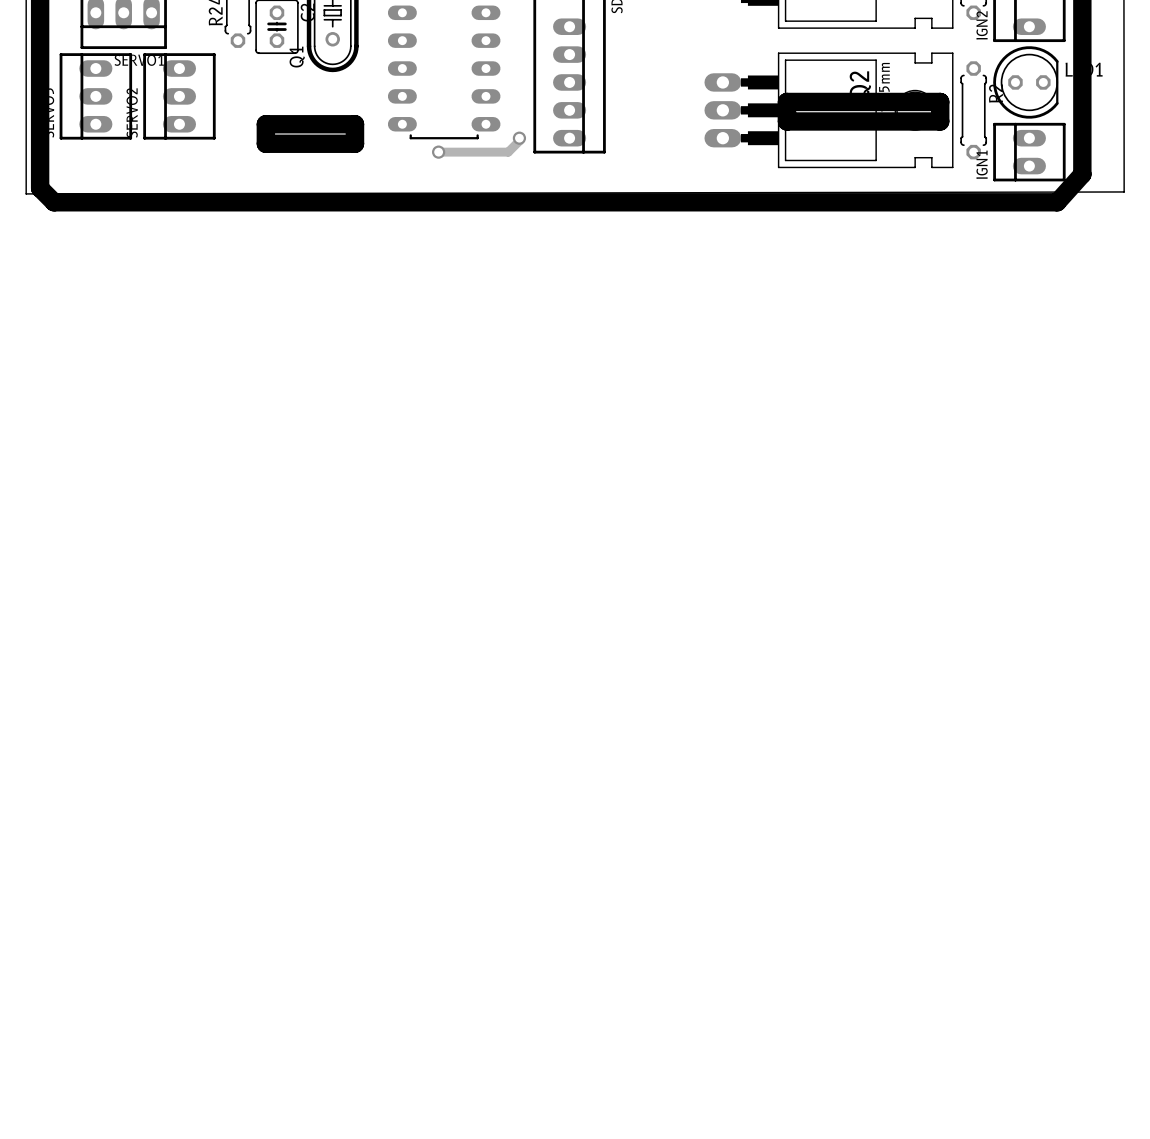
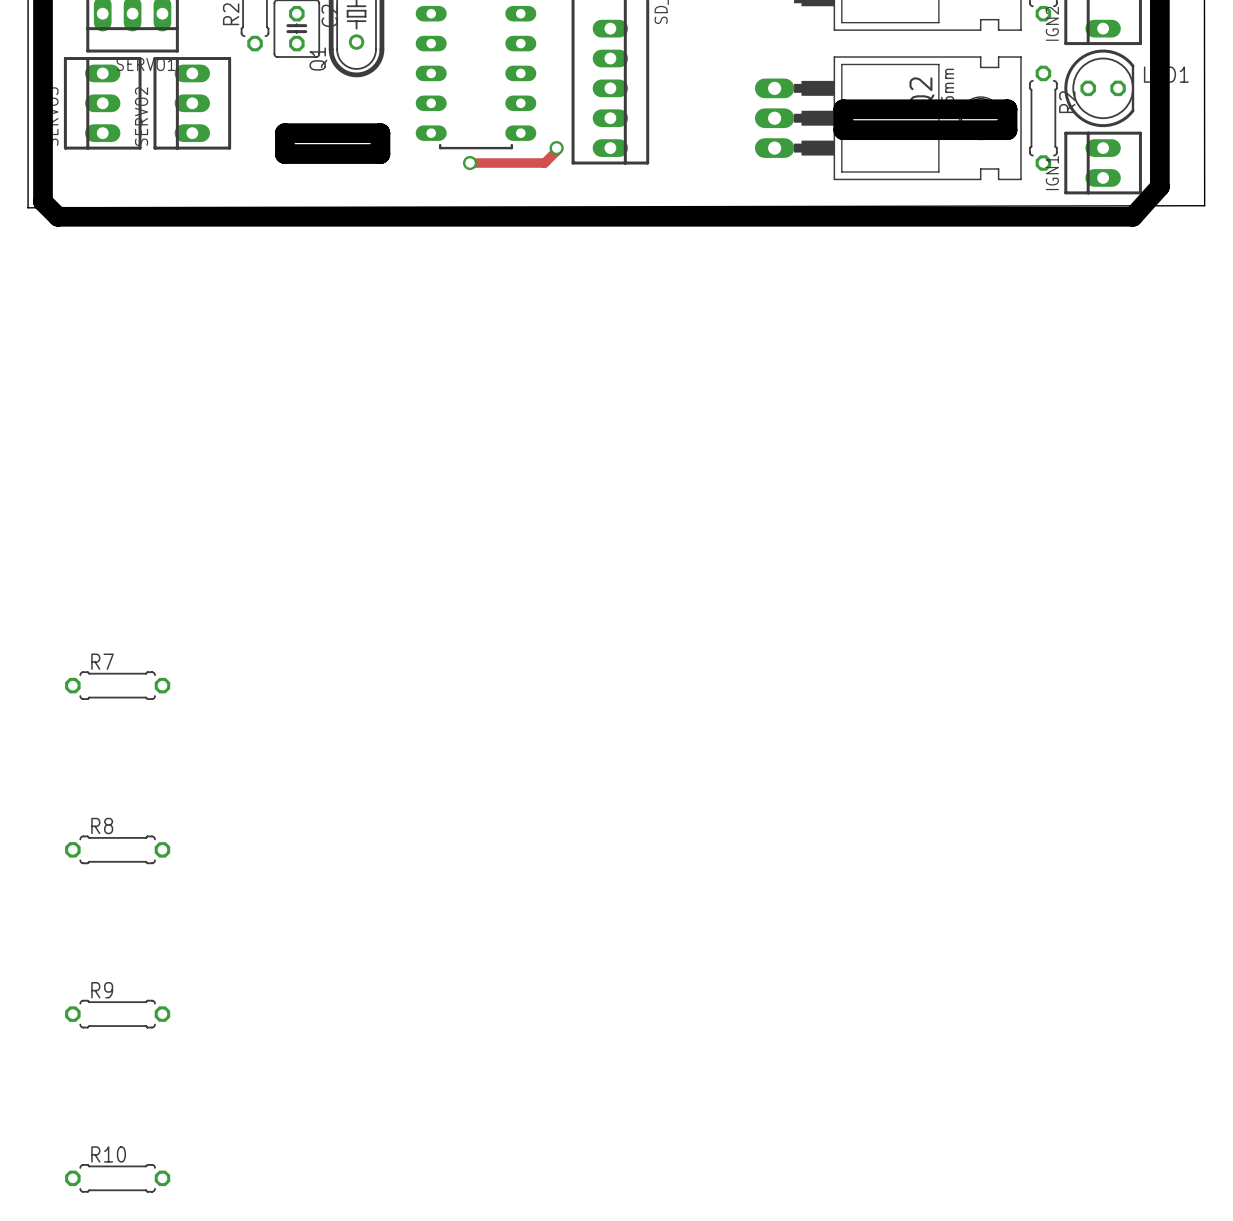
R7: none -> (117, 685)
R8: none -> (117, 849)
R9: none -> (117, 1014)
R10: none -> (117, 1178)

